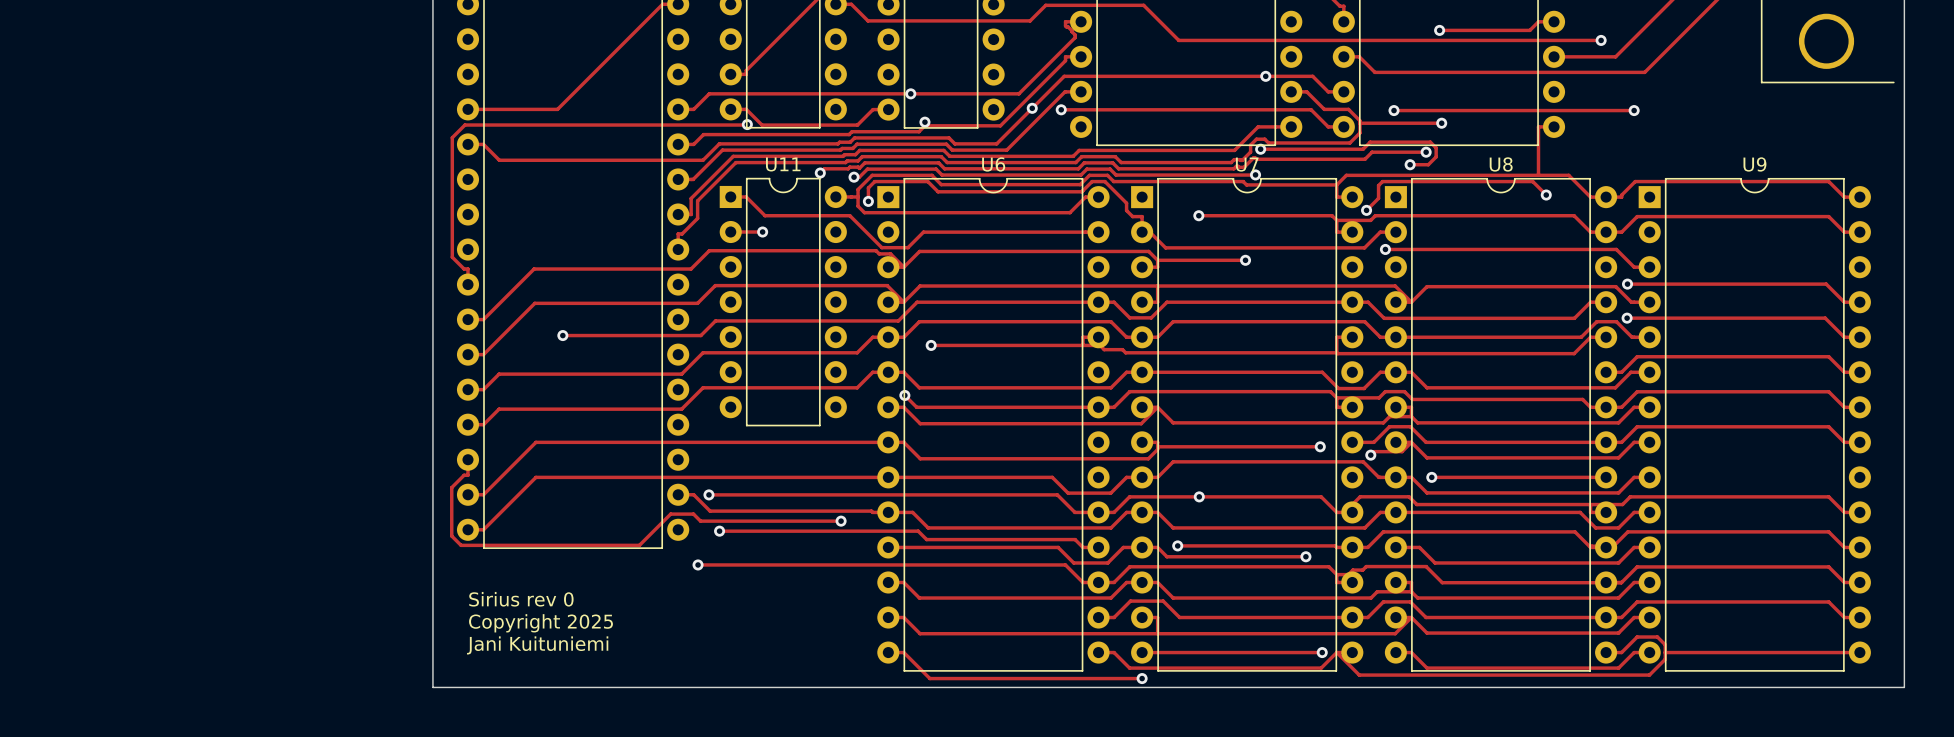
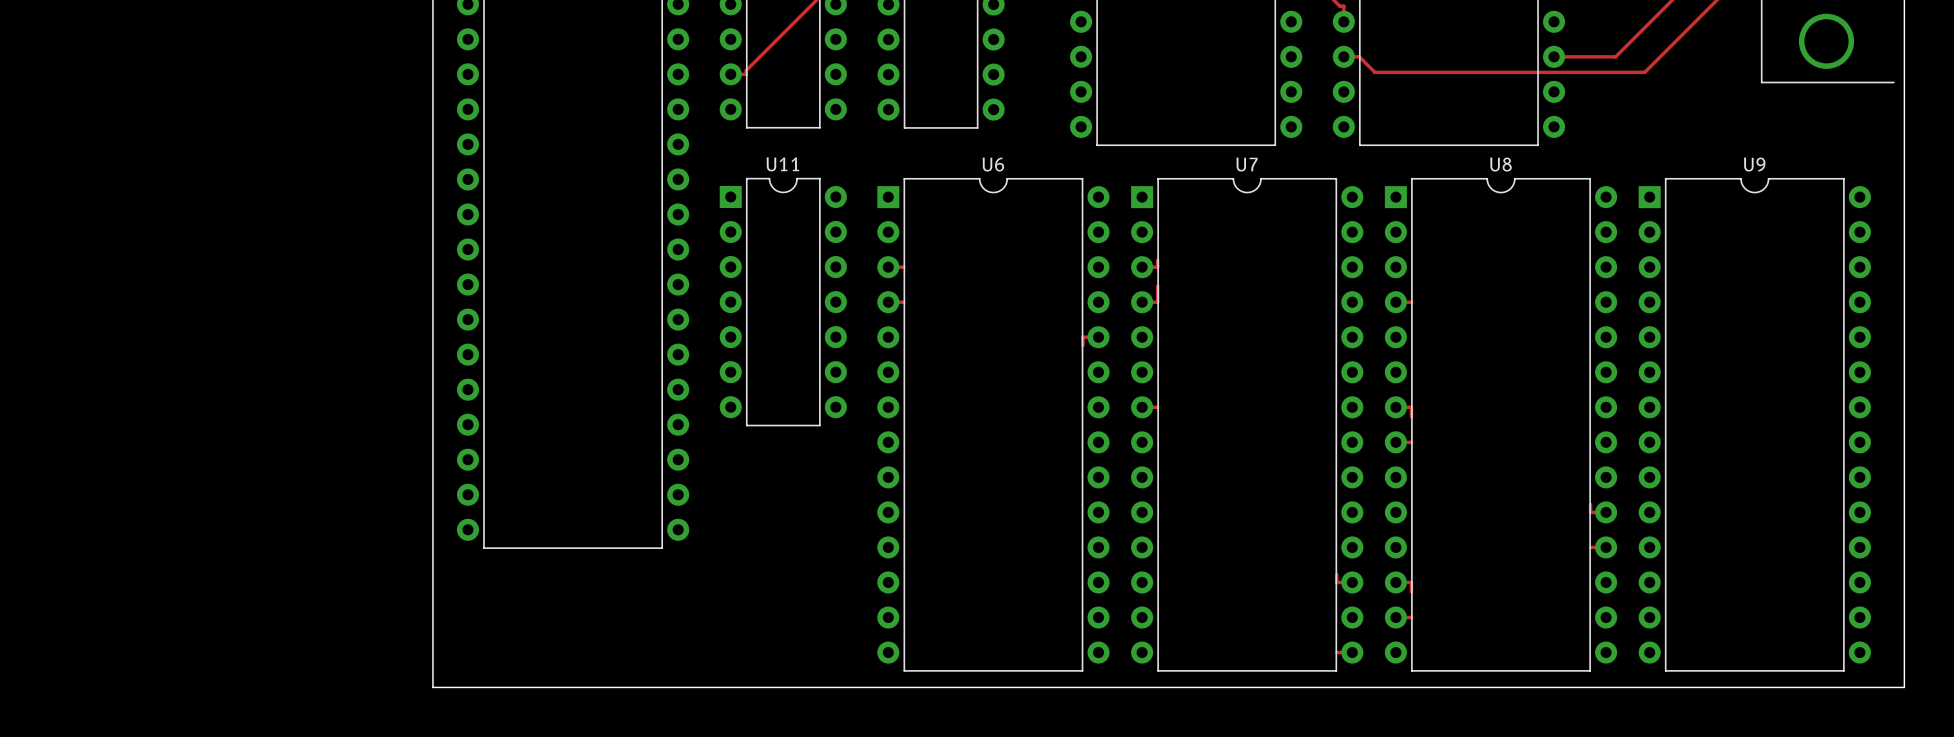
track: (678, 4) (662, 4) (557, 109) (467, 109) -> none
track: (835, 4) (851, 4) (868, 20) (1030, 20) (1045, 5) (1143, 5) (1178, 40) (1601, 40) -> none
track: (1081, 21) (1065, 21) (1065, 25) (1071, 30) (1075, 37) (1018, 93) (709, 93) (693, 109) (678, 109) -> none
track: (1554, 21) (1538, 21) (1529, 30) (1439, 30) -> none
via: (1439, 30) -> none
via: (1601, 40) -> none
track: (1081, 56) (1065, 56) (1065, 60) (1000, 125) (924, 125) -> none
via: (1265, 76) -> none
track: (1081, 91) (1064, 91) (1006, 150) (952, 150) (946, 144) (857, 144) (852, 148) (840, 150) (722, 150) (693, 179) (678, 179) -> none
track: (1291, 91) (1306, 91) (1324, 109) (1348, 109) (1360, 120) (1360, 132) (1349, 143) (1268, 143) (1264, 139) (1256, 139) (1250, 145) (1250, 152) (1242, 160) (1234, 159) (1231, 162) (1121, 162) (1115, 156) (1081, 156) (1075, 162) (947, 162) (941, 156) (862, 156) (858, 160) (845, 162) (735, 162) (697, 200) (697, 218) (682, 233) (678, 233) (678, 249) -> none
track: (1343, 91) (1328, 91) (1312, 76) (1064, 76) (996, 143) (954, 143) (949, 137) (854, 137) (850, 142) (837, 143) (719, 143) (703, 160) (499, 160) (483, 144) (467, 144) -> none
via: (910, 93) -> none
via: (1032, 108) -> none
track: (730, 109) (746, 109) (762, 125) (857, 125) (872, 109) (888, 109) -> none
track: (1061, 109) (1311, 109) (1328, 126) (1343, 126) -> none
via: (1061, 109) -> none
track: (1394, 110) (1634, 110) -> none
via: (1394, 110) -> none
via: (1634, 110) -> none
via: (924, 122) -> none
track: (1360, 123) (1441, 123) -> none
via: (1441, 123) -> none
track: (747, 124) (464, 125) (452, 137) (452, 257) (464, 269) (467, 269) (467, 284) -> none
via: (747, 124) -> none
track: (924, 125) (919, 131) (851, 131) (849, 134) (703, 134) (693, 144) (678, 144) -> none
track: (1291, 126) (1258, 126) (1234, 150) (1079, 150) (1073, 156) (949, 156) (943, 150) (859, 150) (855, 154) (843, 156) (733, 156) (691, 198) (691, 214) (678, 214) -> none
track: (1554, 126) (1538, 126) (1538, 175) -> none
track: (1260, 149) (1363, 149) (1370, 142) (1430, 142) (1436, 147) (1436, 156) (1428, 164) (1410, 164) -> none
via: (1260, 149) -> none
track: (1426, 152) (1372, 152) (1365, 159) (1253, 157) (1244, 167) (1236, 166) (1233, 168) (1118, 168) (1112, 162) (1084, 162) (1078, 168) (944, 168) (938, 162) (864, 162) (859, 168) (824, 168) (820, 173) -> none
via: (1426, 152) -> none
via: (1410, 164) -> none
via: (820, 173) -> none
via: (1255, 174) -> none
track: (1255, 175) (1116, 175) (1110, 169) (1086, 169) (1081, 175) (942, 175) (936, 169) (867, 169) (859, 177) (854, 177) -> none
via: (854, 177) -> none
track: (1336, 184) (1336, 197) (1352, 197) -> none
track: (1336, 184) (1346, 175) (1568, 175) (1590, 197) (1621, 197) (1635, 181) (1828, 181) (1844, 197) (1859, 197) -> none
track: (1336, 184) (1246, 184) (1243, 181) (1113, 181) (1107, 175) (1089, 175) (1080, 184) (941, 184) (931, 175) (872, 175) (858, 189) (858, 206) (864, 212) (1069, 212) (1085, 197) (1098, 197) -> none
track: (1546, 195) (1532, 181) (1382, 181) (1378, 185) (1378, 198) (1366, 210) -> none
via: (1546, 195) -> none
track: (730, 196) (746, 196) (765, 215) (849, 215) (881, 247) (907, 247) (923, 232) (1098, 232) -> none
track: (835, 196) (858, 196) -> none
track: (868, 201) (868, 187) (874, 181) (927, 181) (938, 191) (1081, 191) (1092, 181) (1104, 181) (1126, 203) (1126, 210) (1132, 216) (1142, 216) (1142, 232) -> none
via: (868, 201) -> none
via: (1366, 210) -> none
track: (1198, 215) (1332, 215) (1336, 220) -> none
via: (1198, 215) -> none
track: (1336, 220) (1336, 232) (1352, 232) -> none
track: (1336, 220) (1370, 220) (1375, 215) (1574, 215) (1590, 232) (1621, 232) (1637, 216) (1828, 216) (1844, 232) (1859, 232) -> none
track: (1142, 224) (1165, 247) (1364, 247) (1380, 232) (1395, 232) -> none
track: (730, 232) (762, 232) -> none
via: (762, 232) -> none
track: (1385, 249) (1616, 249) (1634, 267) (1649, 267) -> none
via: (1385, 249) -> none
track: (1245, 260) (1157, 260) (1148, 251) (919, 251) (903, 267) (890, 253) (879, 253) (876, 250) (709, 250) (691, 269) (534, 269) (483, 319) (467, 319) -> none
via: (1245, 260) -> none
track: (1627, 284) (1826, 284) (1844, 302) (1859, 302) -> none
via: (1627, 284) -> none
track: (1606, 302) (1590, 302) (1574, 318) (1384, 318) (1368, 302) (1166, 302) (1151, 317) (1129, 317) (1114, 302) (917, 302) (898, 320) (715, 320) (700, 335) (562, 335) -> none
track: (1649, 302) (1631, 302) (1615, 286) (1426, 286) (1411, 302) (1395, 286) (920, 286) (903, 302) (887, 285) (715, 285) (697, 303) (534, 303) (483, 354) (467, 354) -> none
track: (1627, 318) (1825, 318) (1844, 337) (1859, 337) -> none
via: (1627, 318) -> none
via: (562, 335) -> none
track: (1352, 337) (1336, 337) (1336, 352) -> none
track: (1606, 337) (1590, 337) (1574, 353) (1336, 352) -> none
track: (1649, 337) (1632, 337) (1616, 321) (1596, 321) (1581, 337) (1380, 337) (1364, 321) (1173, 321) (1157, 337) (1126, 337) (1111, 321) (919, 321) (903, 337) (872, 337) (857, 352) (703, 352) (681, 374) (499, 374) (483, 389) (467, 389) -> none
track: (931, 345) (1099, 345) (1104, 349) (1122, 349) (1125, 352) (1336, 352) -> none
via: (931, 345) -> none
track: (1606, 372) (1621, 372) (1637, 356) (1828, 356) (1844, 372) (1859, 372) -> none
track: (1649, 372) (1630, 372) (1615, 387) (1426, 387) (1411, 372) (1380, 372) (1364, 388) (1338, 388) (1322, 372) (1126, 372) (1111, 387) (919, 387) (903, 372) (872, 372) (857, 387) (703, 387) (681, 409) (499, 409) (483, 424) (467, 424) -> none
track: (904, 395) (916, 407) (1114, 407) (1129, 391) (1330, 391) (1336, 397) -> none
via: (904, 395) -> none
track: (1336, 397) (1336, 407) (1352, 407) -> none
track: (1336, 397) (1379, 397) (1385, 391) (1404, 391) (1412, 399) (1582, 399) (1590, 407) (1621, 407) (1637, 391) (1828, 391) (1844, 407) (1859, 407) -> none
track: (888, 407) (903, 407) (920, 423) (1141, 423) (1157, 407) (1173, 422) (1383, 422) (1389, 416) (1411, 416) (1417, 422) (1618, 422) (1634, 407) (1649, 407) -> none
track: (1142, 442) (1157, 442) (1157, 449) (1148, 458) (920, 458) (903, 442) (535, 442) (483, 494) (467, 494) -> none
track: (1352, 442) (1373, 442) (1389, 426) (1410, 426) (1426, 442) (1621, 442) (1637, 426) (1828, 426) (1844, 442) (1859, 442) -> none
track: (1649, 442) (1634, 442) (1618, 457) (1426, 457) (1411, 442) (1402, 451) (1374, 451) (1370, 455) -> none
track: (1157, 446) (1320, 446) -> none
via: (1320, 446) -> none
via: (1370, 455) -> none
track: (467, 459) (467, 475) (464, 475) (451, 487) (451, 536) (461, 545) (639, 545) (670, 514) (693, 514) (700, 521) (841, 521) -> none
track: (1431, 477) (1606, 477) -> none
via: (1431, 477) -> none
track: (1649, 477) (1634, 477) (1618, 492) (1426, 492) (1411, 477) (1378, 477) (1363, 461) (1173, 461) (1157, 477) (1126, 477) (1110, 493) (1068, 493) (1052, 477) (535, 477) (483, 529) (467, 529) -> none
track: (678, 494) (693, 494) (710, 511) (912, 512) (928, 527) (1111, 527) (1126, 512) (1157, 512) (1173, 527) (1364, 527) (1380, 512) (1580, 512) (1595, 527) (1618, 527) (1634, 512) (1649, 512) -> none
track: (708, 494) (1057, 494) (1074, 512) (1114, 512) (1129, 496) (1321, 496) (1336, 512) (1352, 512) -> none
via: (708, 494) -> none
via: (1199, 496) -> none
track: (1344, 512) (1360, 496) (1409, 496) (1416, 504) (1622, 504) (1630, 496) (1828, 496) (1844, 512) (1859, 512) -> none
via: (841, 521) -> none
track: (719, 531) (918, 531) (926, 539) (1075, 539) (1082, 547) (1098, 547) -> none
via: (719, 531) -> none
track: (1177, 545) (1367, 547) (1383, 531) (1575, 531) (1590, 547) (1613, 546) (1627, 531) (1828, 531) (1844, 547) (1859, 547) -> none
via: (1177, 545) -> none
track: (888, 547) (1058, 547) (1073, 562) (1107, 562) (1123, 547) (1157, 547) (1166, 556) (1305, 556) -> none
track: (1395, 547) (1419, 547) (1435, 562) (1618, 562) (1634, 547) (1649, 547) -> none
via: (1305, 556) -> none
track: (698, 564) (1065, 564) (1082, 582) (1114, 582) (1129, 566) (1328, 566) (1336, 574) (1348, 574) (1352, 570) (1362, 570) (1366, 566) (1426, 566) (1442, 582) (1621, 582) (1637, 566) (1828, 566) (1844, 582) (1859, 582) -> none
via: (698, 564) -> none
track: (888, 582) (903, 582) (919, 598) (1111, 598) (1126, 582) (1157, 582) (1173, 598) (1371, 598) (1377, 591) (1411, 591) (1417, 598) (1618, 598) (1634, 582) (1649, 582) -> none
text: Sirius rev 0 (521, 599) -> none
track: (888, 617) (903, 617) (920, 633) (1395, 633) (1411, 617) (1426, 633) (1618, 633) (1634, 617) (1649, 617) -> none
track: (1098, 617) (1114, 617) (1130, 601) (1163, 601) (1179, 617) (1367, 617) (1383, 601) (1410, 601) (1426, 617) (1621, 617) (1637, 601) (1828, 601) (1844, 617) (1859, 617) -> none
track: (1142, 617) (1157, 617) (1157, 633) -> none
text: Copyright 2025 (541, 623) -> none
text: Jani Kuituniemi (537, 645) -> none
track: (888, 652) (903, 652) (929, 678) (1142, 678) -> none
track: (1098, 652) (1114, 652) (1129, 668) (1321, 668) (1336, 652) (1359, 675) (1649, 675) (1665, 659) (1665, 644) (1657, 637) (1637, 637) (1621, 652) (1606, 652) -> none
track: (1142, 652) (1322, 652) -> none
via: (1322, 652) -> none
track: (1395, 652) (1411, 652) (1426, 668) (1618, 668) (1634, 652) (1649, 652) -> none
track: (1665, 652) (1859, 652) -> none
via: (1142, 678) -> none

